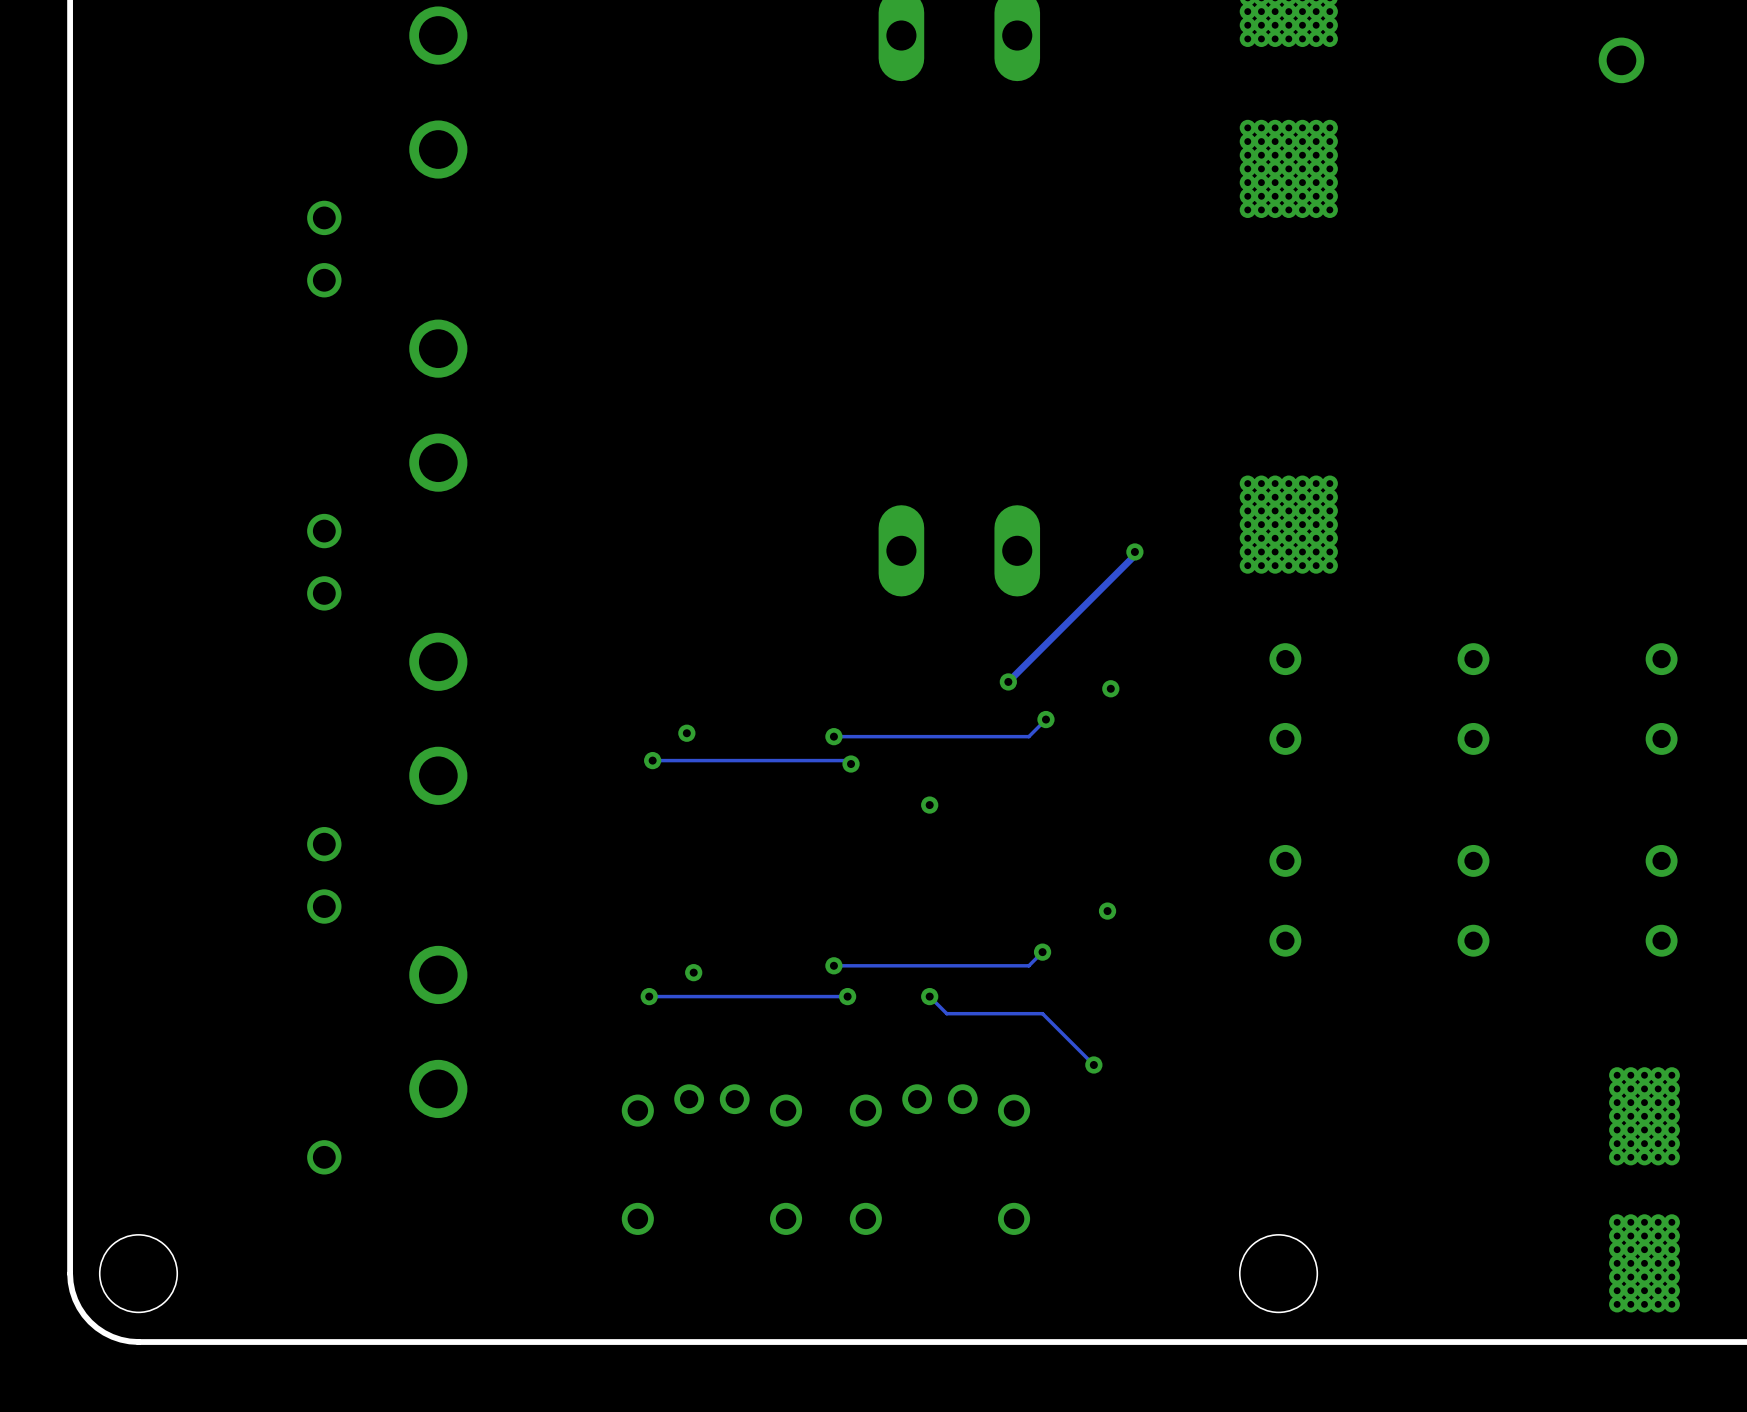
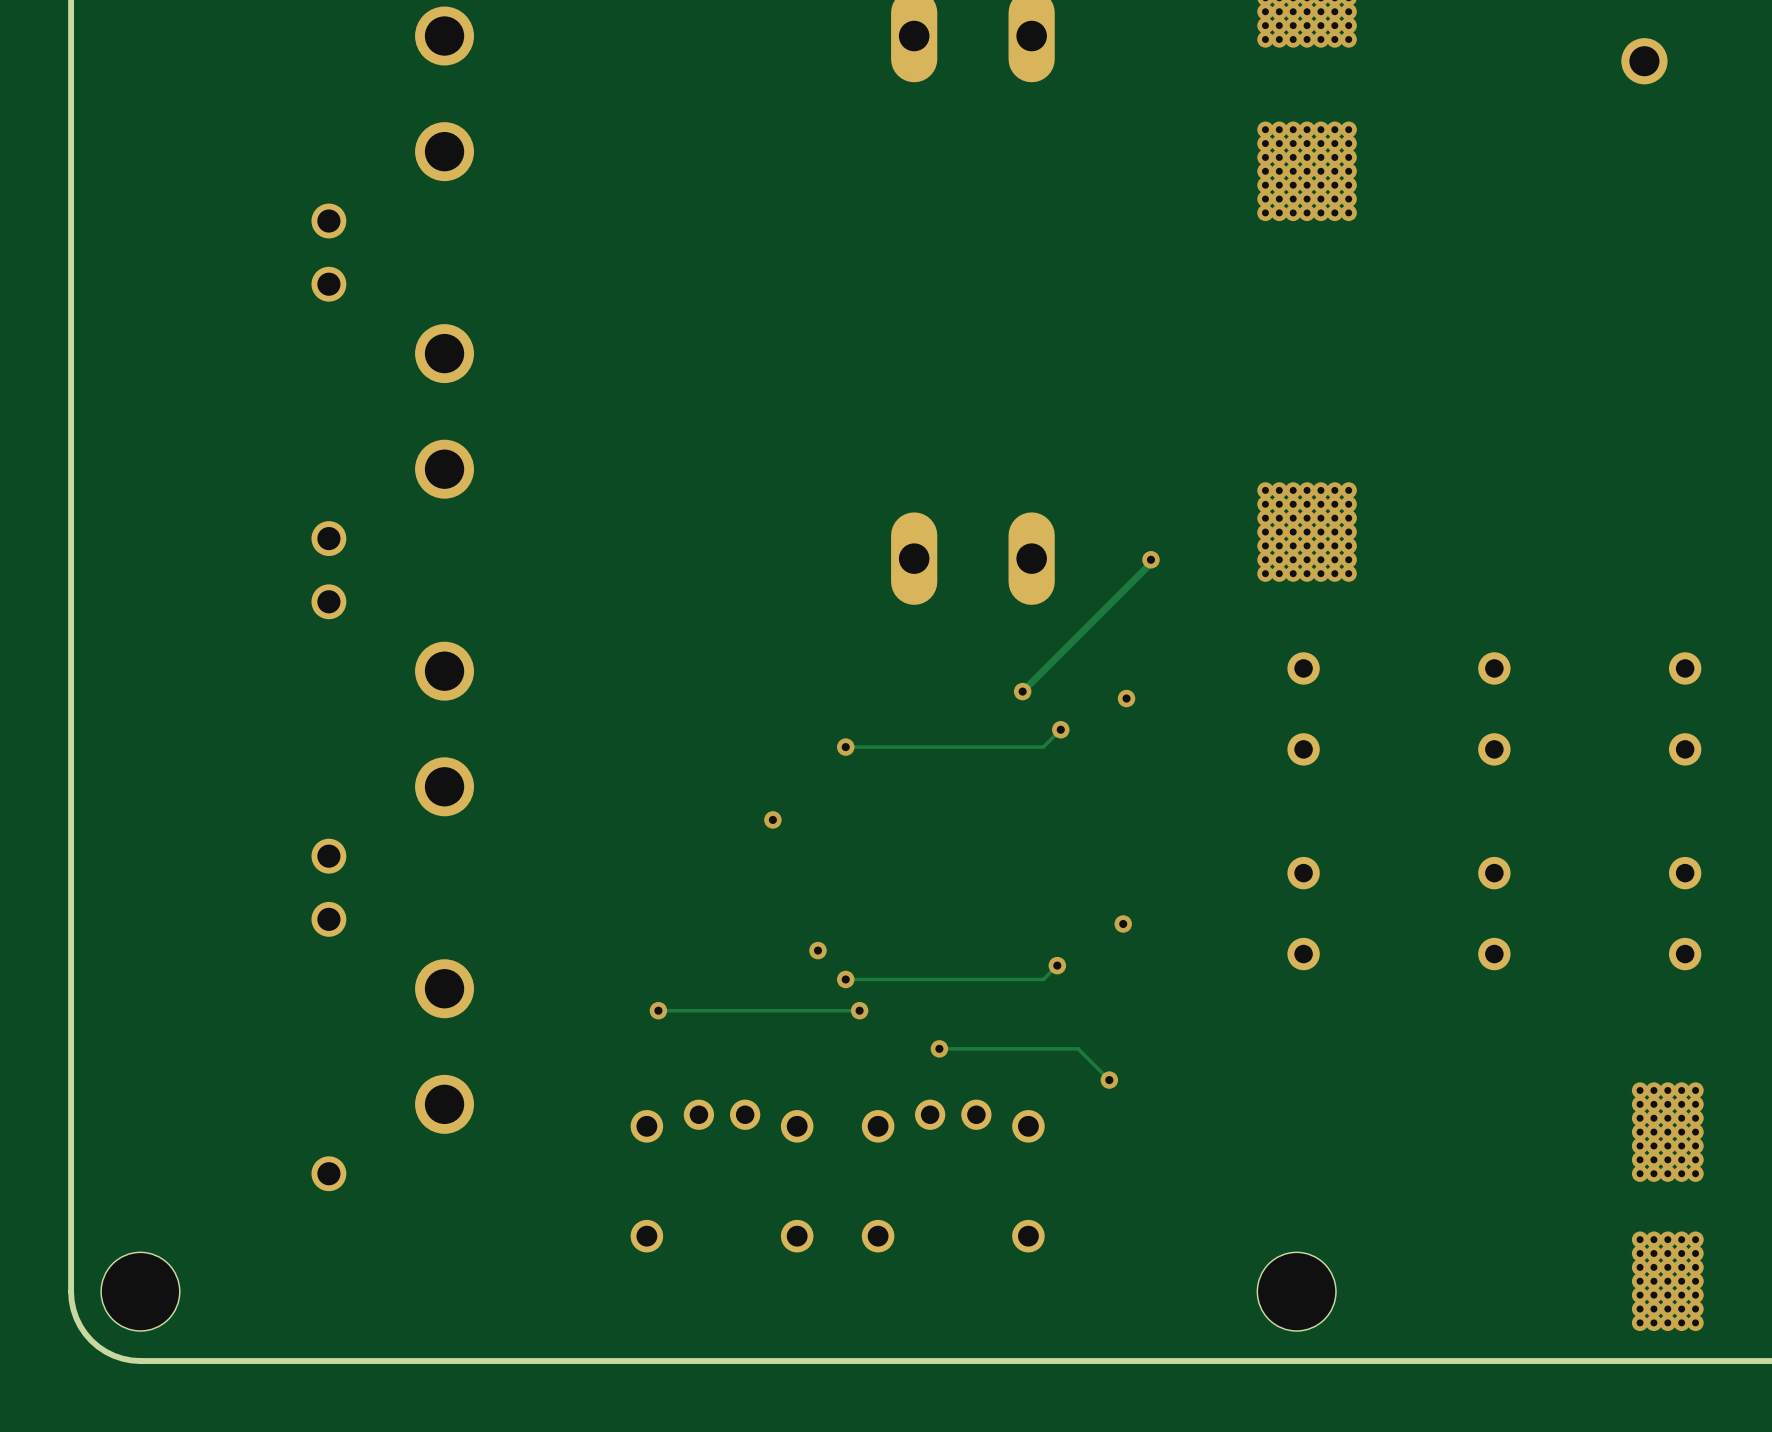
via: (686, 733) -> none
track: (652, 760) (847, 760) (851, 764) -> none
via: (652, 760) -> none
via: (851, 764) -> none
via: (929, 805) -> none
via: none -> (772, 819)
via: none -> (817, 950)
via: (693, 972) -> none
track: (929, 996) (946, 1013) (1042, 1013) (1063, 1034) -> (939, 1048) (1078, 1048)
via position: (929, 996) -> (939, 1048)

